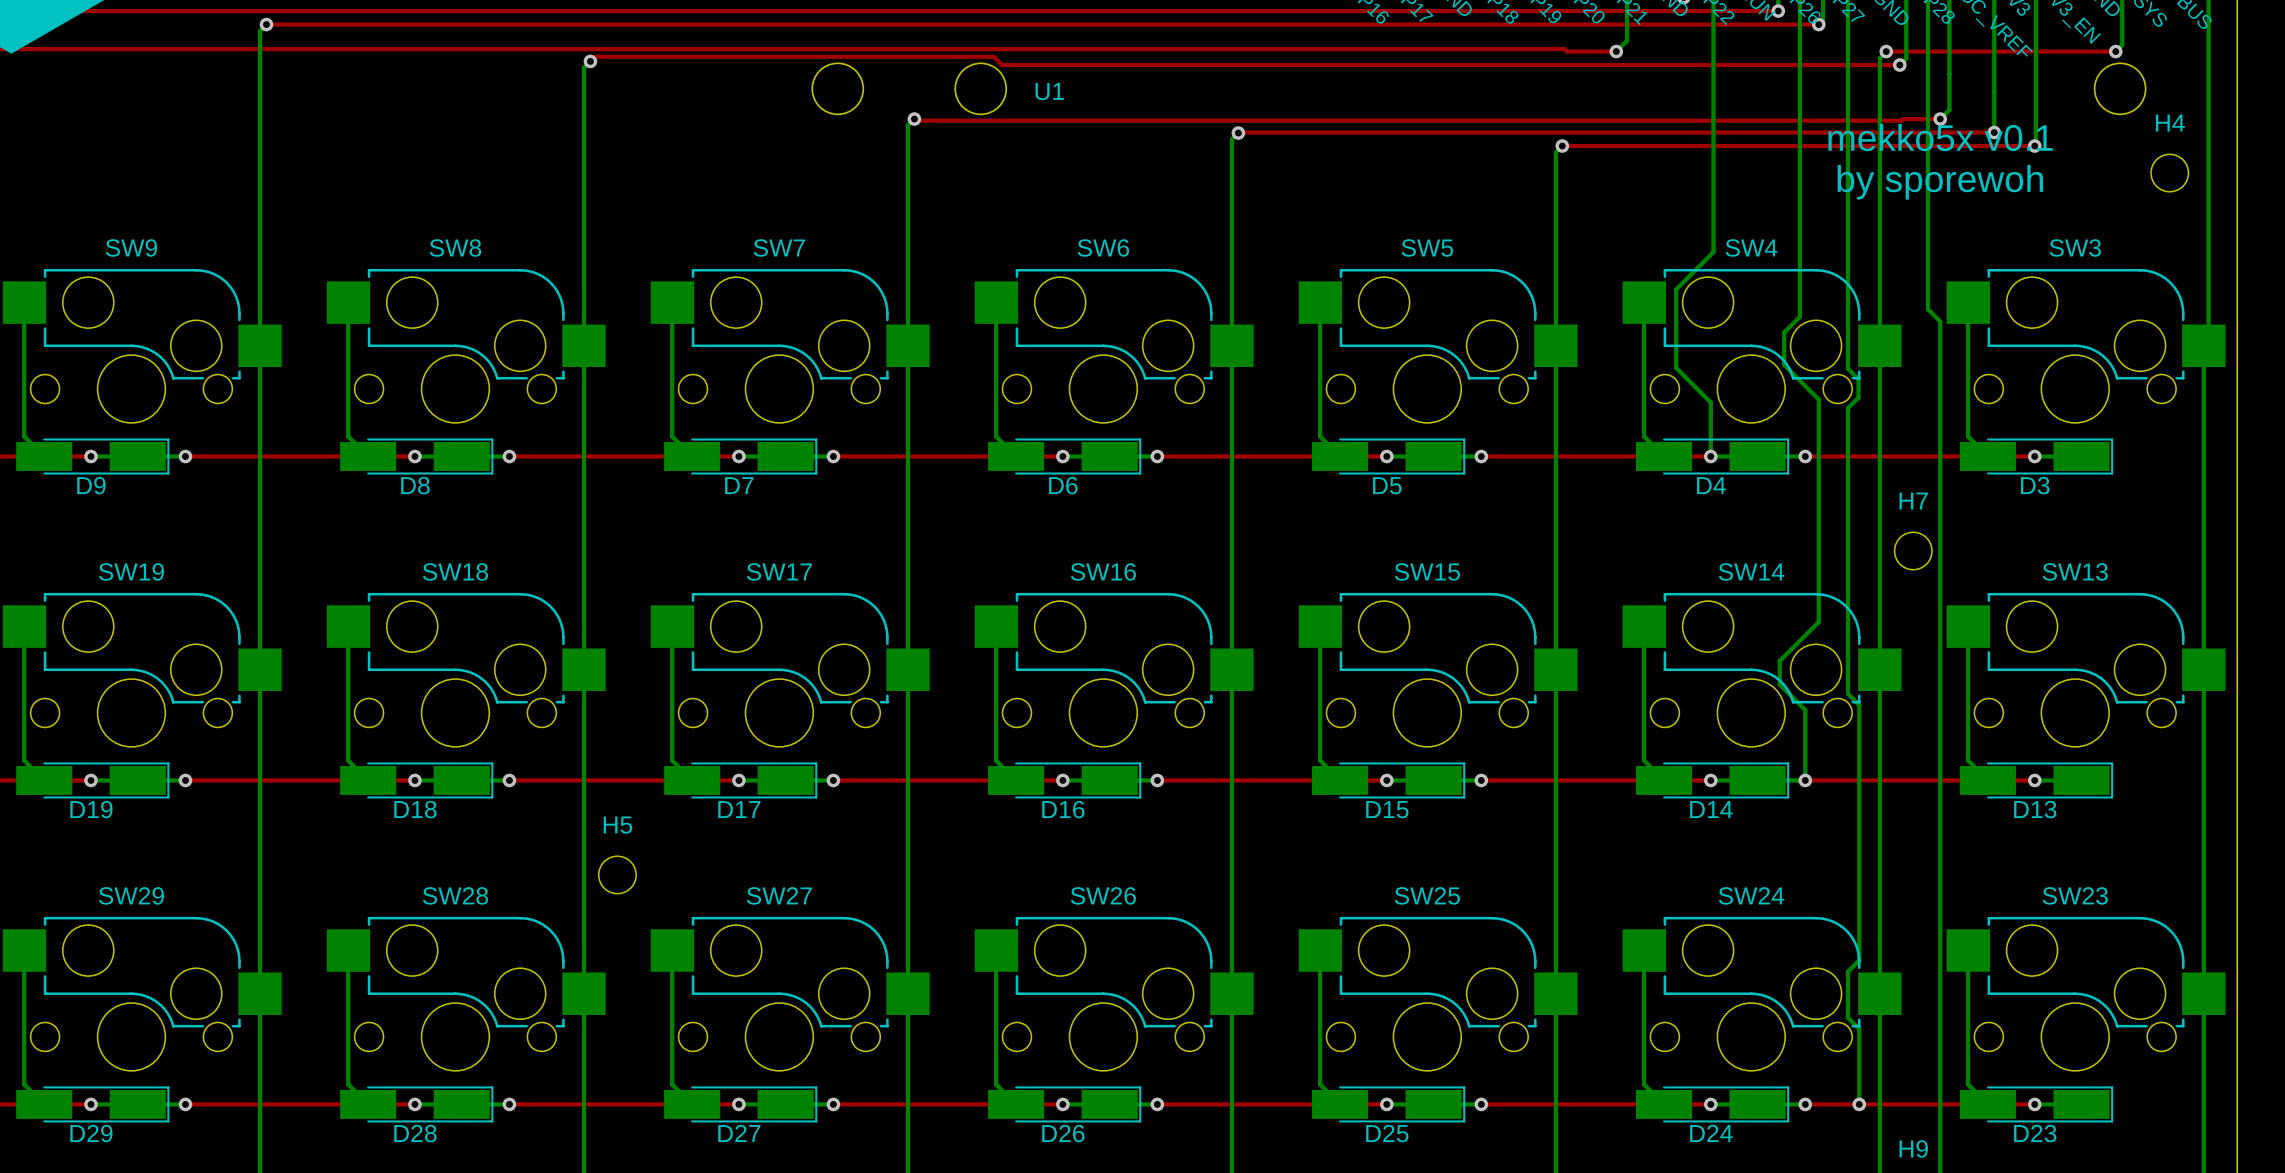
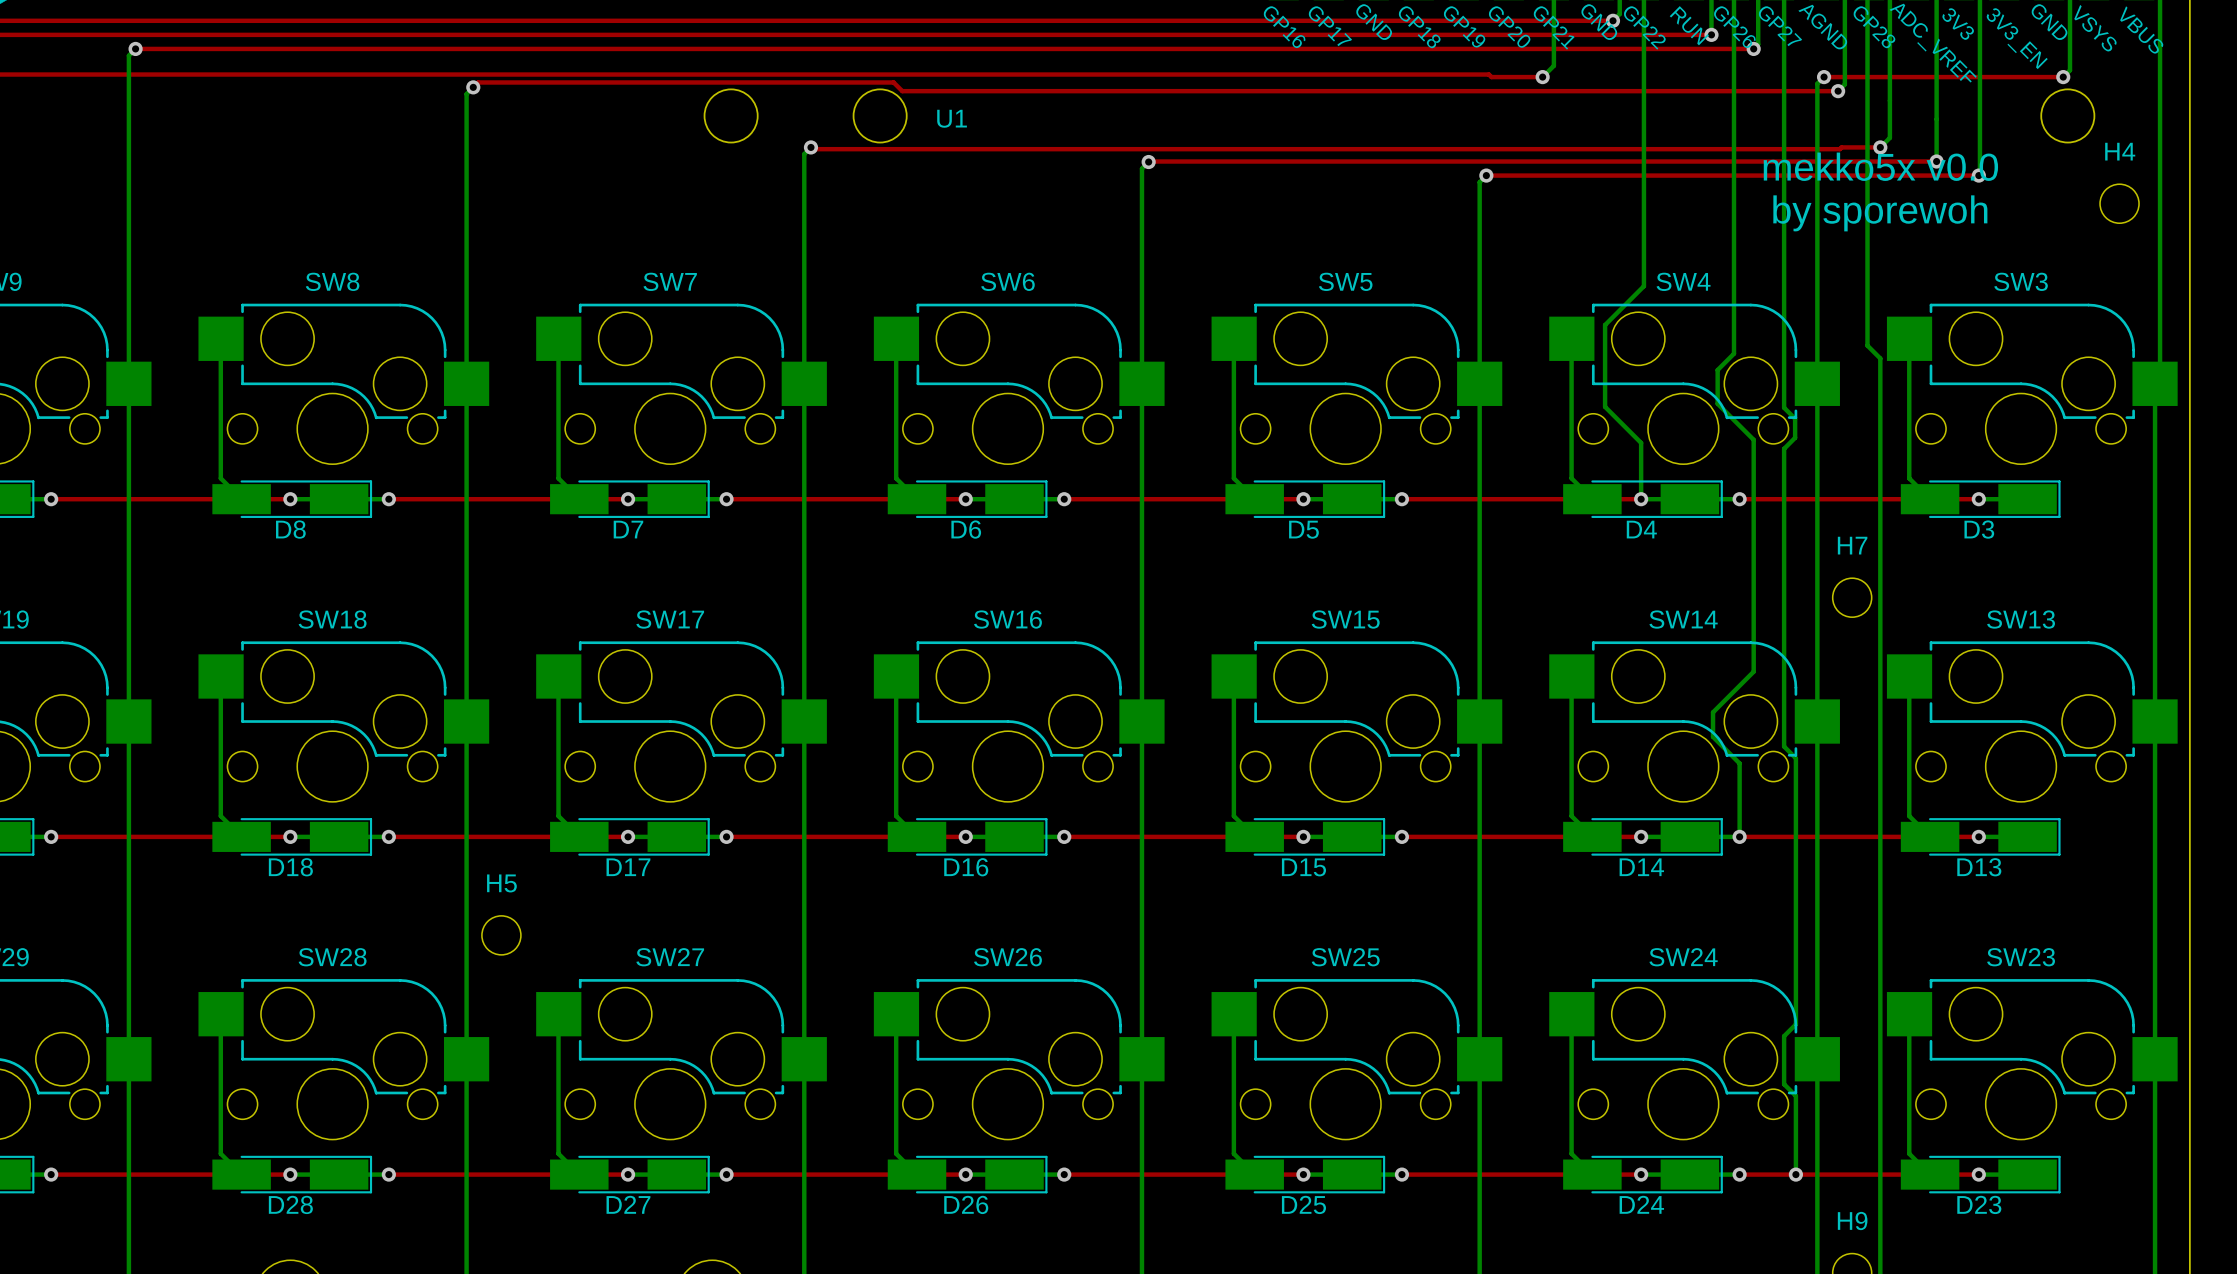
text: mekko5x v0.1 (1940, 137) -> mekko5x v0.0 (1880, 166)

